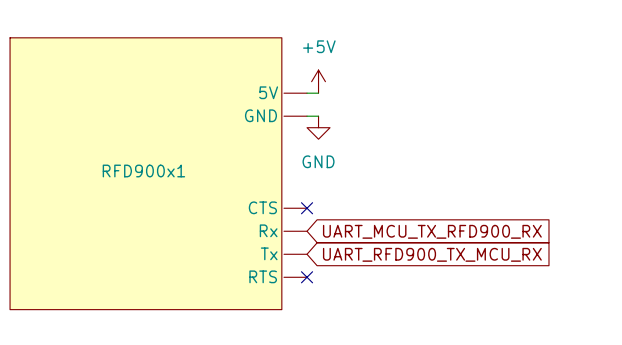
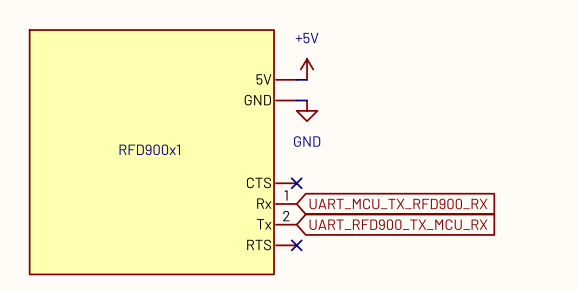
RFD900x1 pin number: none -> 1 (286, 195)
RFD900x1 pin number: none -> 2 (286, 216)

